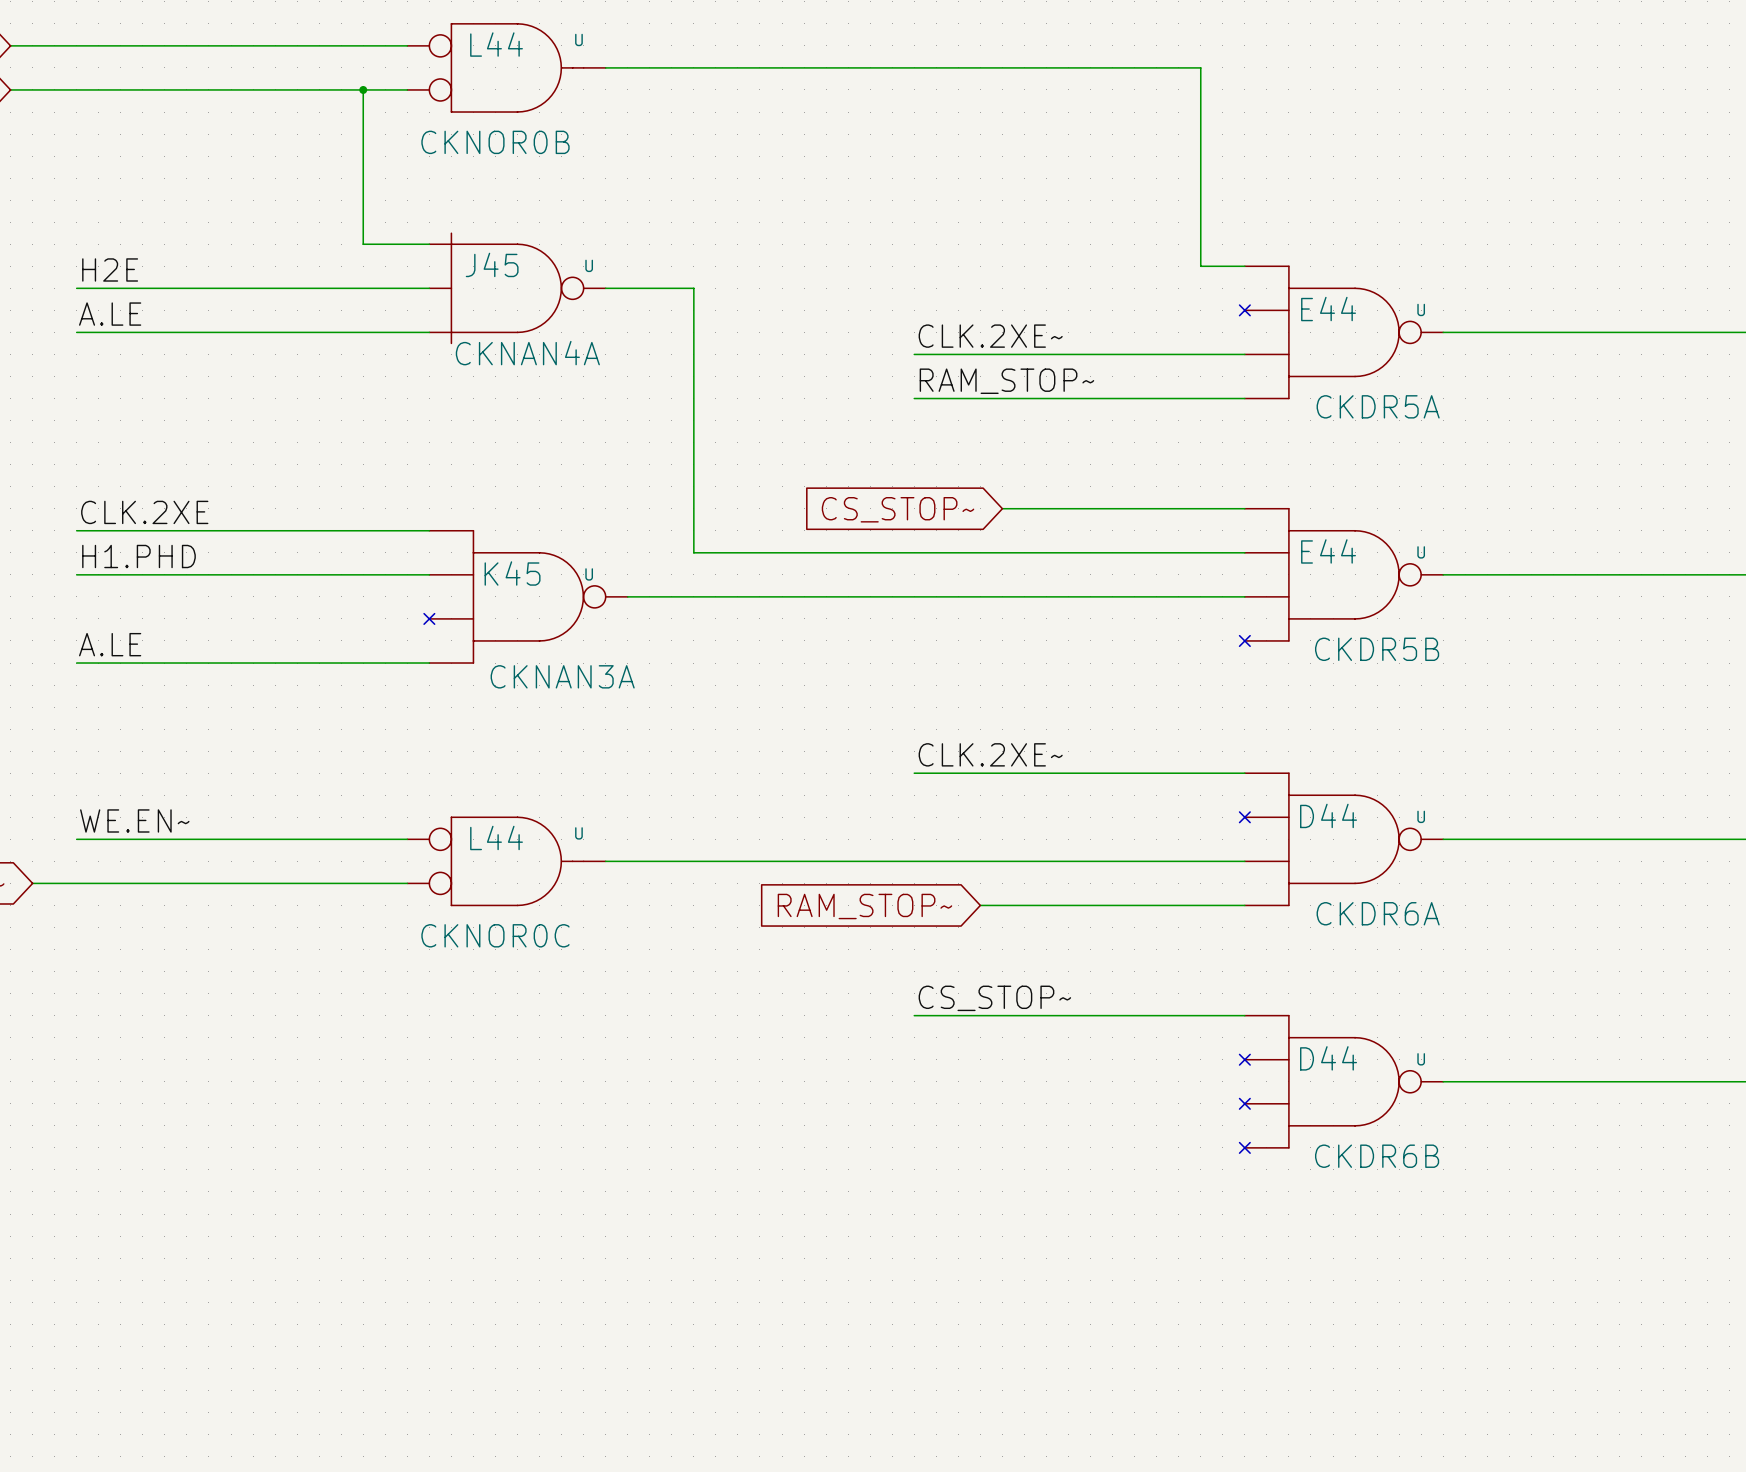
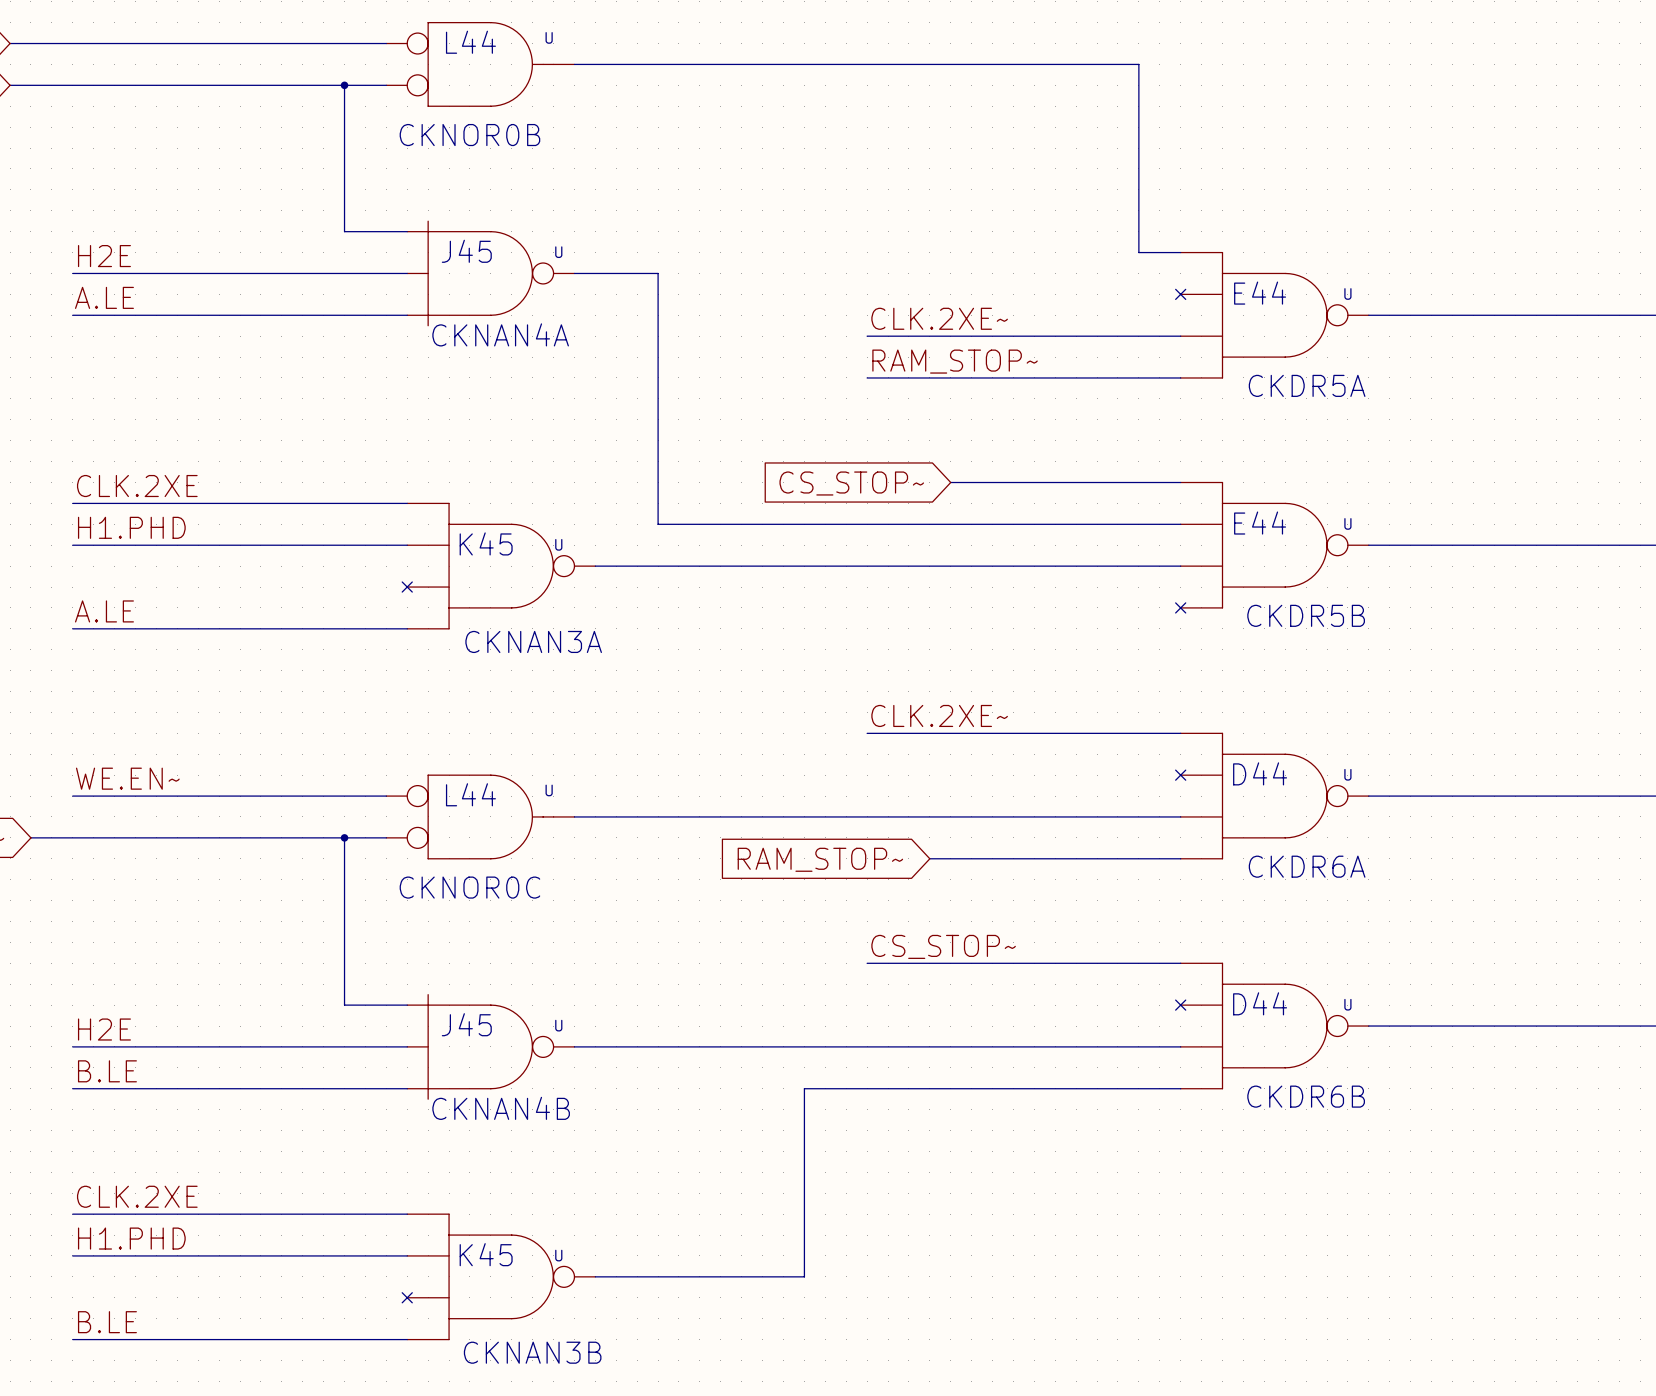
wire: none -> (344, 837) (344, 1005) (407, 1005)
junction: none -> (344, 837)
label: none -> H2E (104, 1029)
wire: none -> (72, 1046) (407, 1046)
U: none -> (490, 1046)
wire: none -> (574, 1046) (1180, 1046)
no-connect mark: (1244, 1103) -> none
label: none -> B.LE (107, 1071)
wire: none -> (72, 1088) (407, 1088)
wire: none -> (1180, 1088) (804, 1088) (804, 1276) (595, 1276)
no-connect mark: (1244, 1147) -> none
label: none -> CLK.2XE (137, 1196)
wire: none -> (72, 1214) (407, 1214)
label: none -> H1.PHD (131, 1238)
wire: none -> (72, 1255) (407, 1255)
U: none -> (501, 1276)
no-connect mark: none -> (407, 1297)
label: none -> B.LE (107, 1322)
wire: none -> (72, 1339) (407, 1339)

